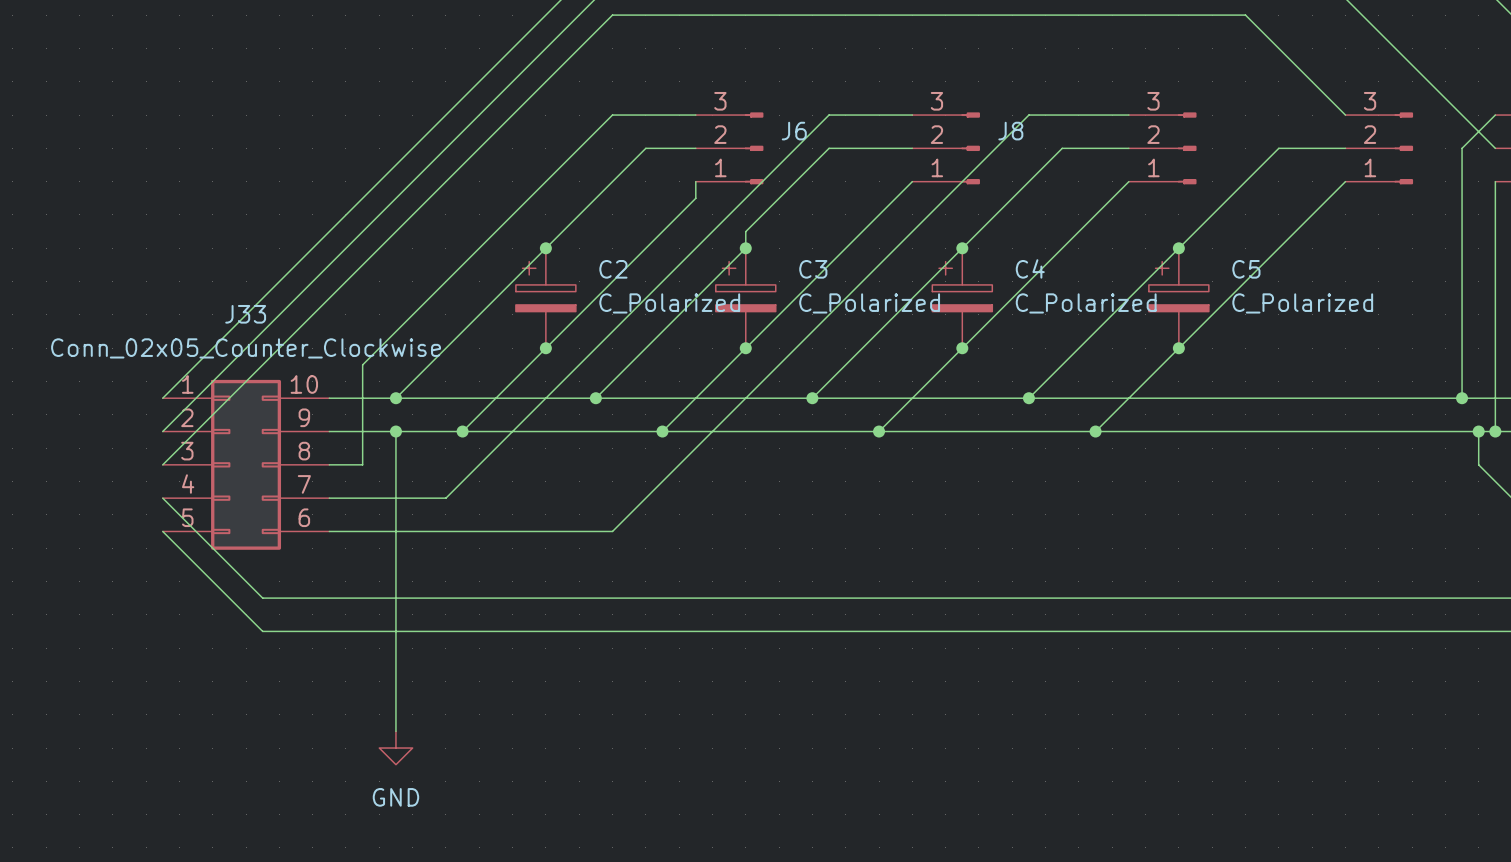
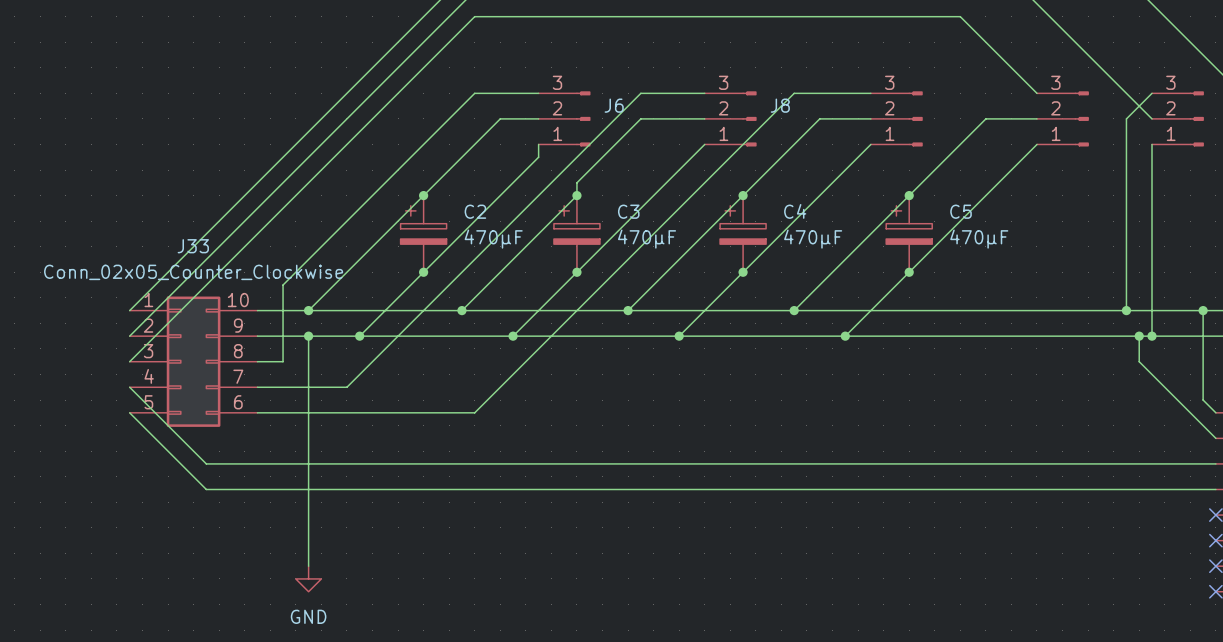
C2 value: C_Polarized (669, 303) -> 470µF (493, 239)
C3 value: C_Polarized (869, 303) -> 470µF (647, 239)
C4 value: C_Polarized (1086, 303) -> 470µF (813, 239)
C5 value: C_Polarized (1302, 303) -> 470µF (979, 239)

